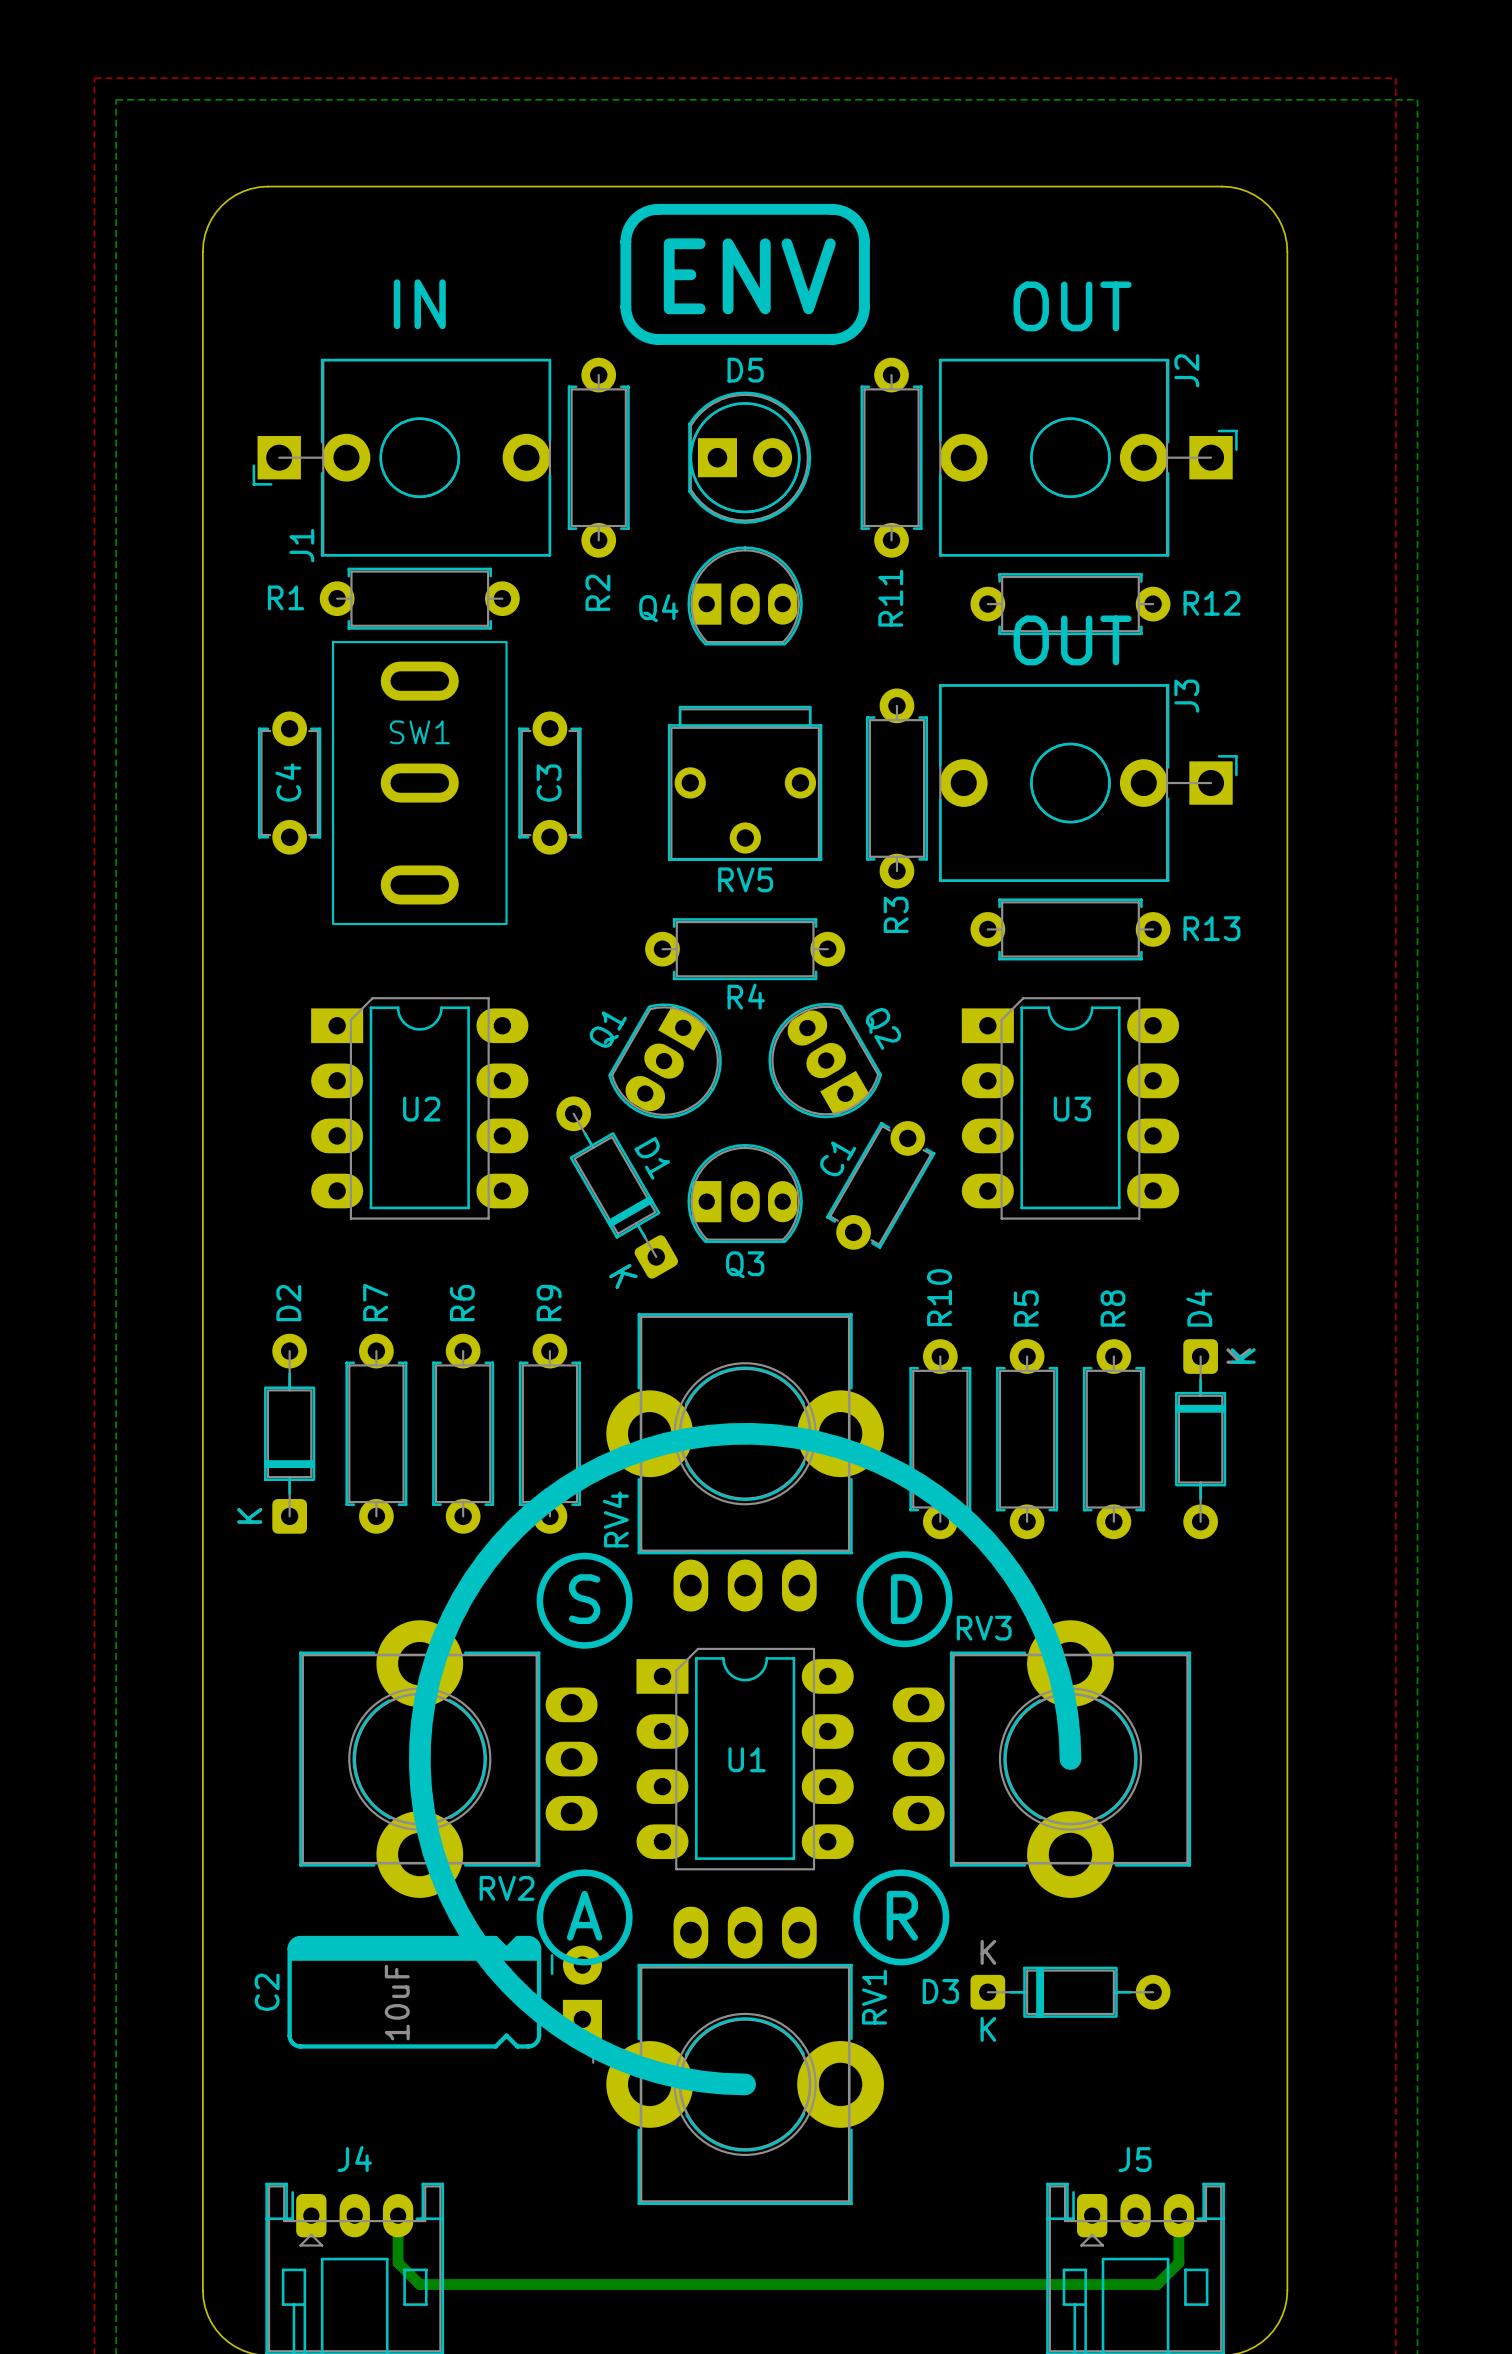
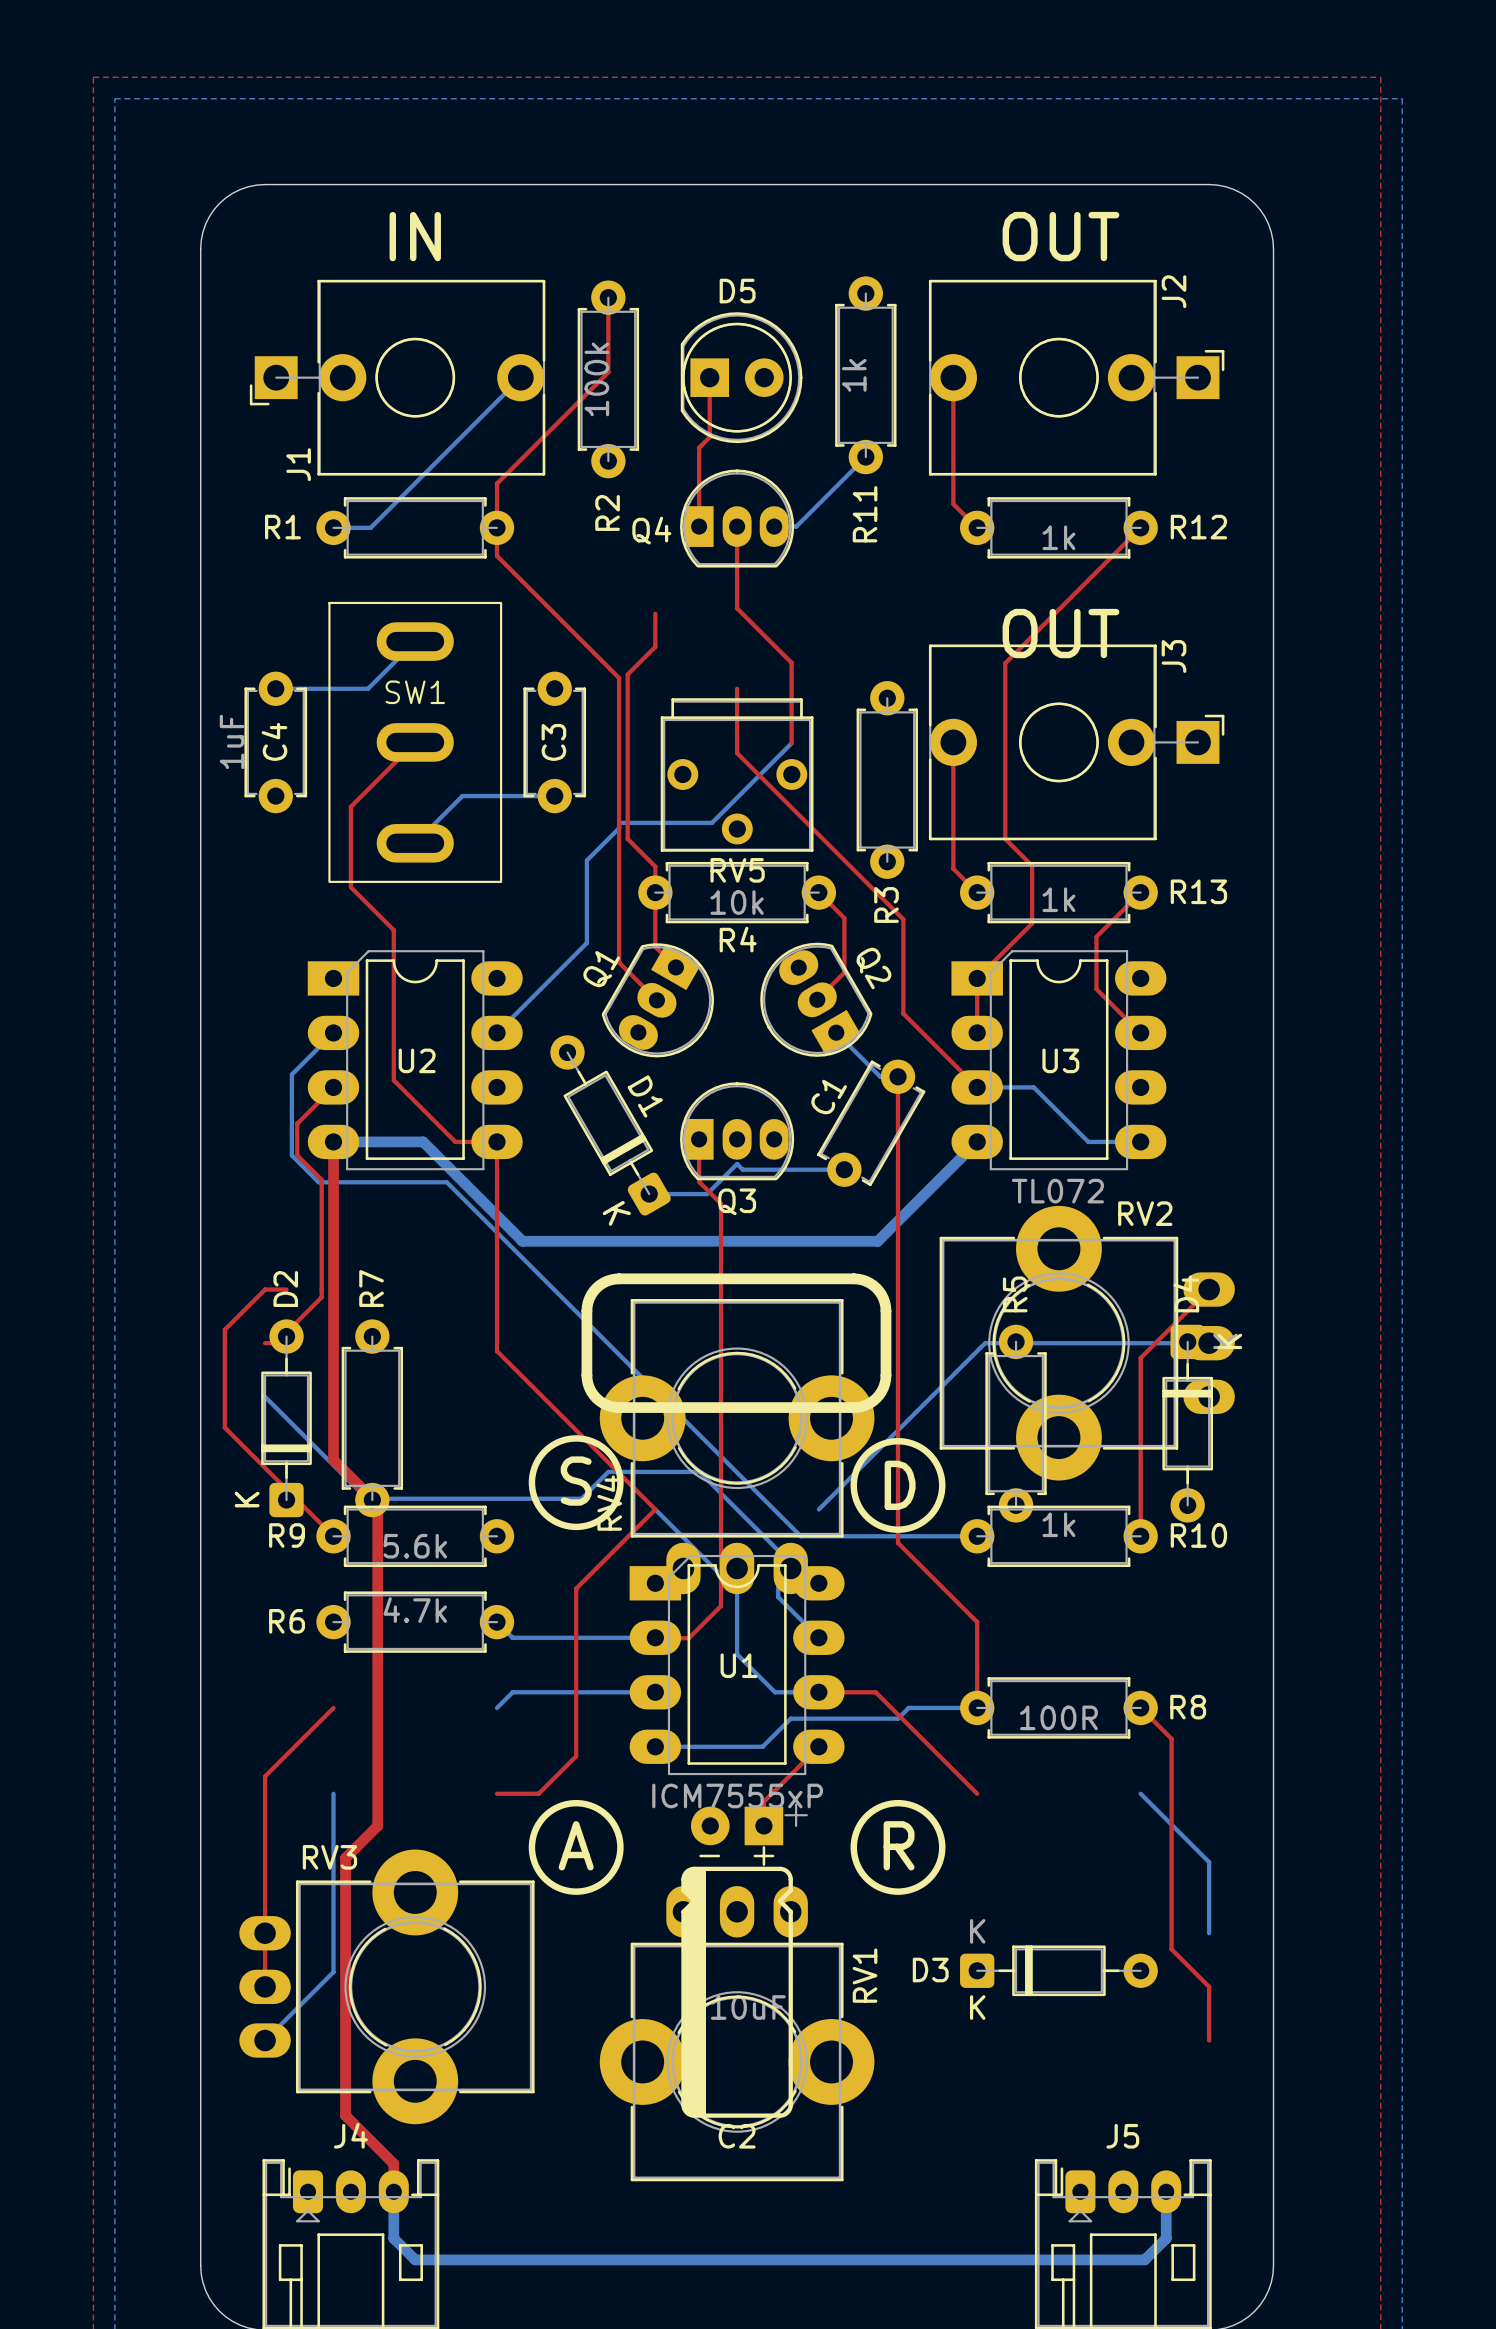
line: (658, 209) (831, 209) (848, 213) (860, 225) (864, 237) (864, 306) (860, 323) (848, 335) (831, 339) (658, 339) (642, 335) (630, 323) (626, 311) (626, 237) (630, 225) (635, 218) (645, 211) (658, 209) -> none
text: ENV (749, 276) -> none
top track: none -> (608, 297) (608, 372) (497, 483) (497, 555) (619, 678) (619, 962) (656, 1000)
text position: IN (419, 304) -> IN (415, 236)
text position: OUT (1072, 306) -> OUT (1060, 236)
R11 value: none -> 1k (854, 375)
bottom track: none -> (520, 377) (370, 527) (333, 527)
top track: none -> (709, 377) (710, 436) (699, 447) (699, 526)
top track: none -> (953, 377) (953, 504) (977, 527)
R2 value: none -> 100k (596, 379)
J1 position: (401, 457) -> (397, 377)
R2 position: (598, 457) -> (608, 379)
D5 position: (749, 457) -> (741, 377)
R11 position: (891, 457) -> (865, 375)
J2 position: (1088, 457) -> (1076, 377)
bottom track: none -> (865, 457) (796, 526) (774, 526)
top track: none -> (737, 526) (737, 608) (791, 662) (791, 743)
top track: none -> (1140, 527) (1005, 663) (1005, 838) (1032, 865) (1032, 923) (977, 978) (977, 1032)
R12 value: none -> 1k (1058, 537)
Q4 position: (745, 595) -> (737, 518)
R1 position: (419, 598) -> (415, 527)
R12 position: (1070, 604) -> (1058, 527)
top track: none -> (655, 613) (655, 646) (627, 674) (627, 838) (655, 866) (655, 946) (675, 967)
bottom track: none -> (415, 641) (368, 688) (275, 688)
top track: none -> (737, 688) (737, 753) (903, 919) (903, 1013) (977, 1087)
C4 value: none -> 1uF (232, 741)
top track: none -> (415, 742) (350, 806) (350, 887) (393, 930) (393, 1080) (455, 1141) (497, 1141) (497, 1351) (655, 1509) (576, 1588) (576, 1756) (538, 1793) (497, 1793)
top track: none -> (953, 742) (953, 868) (977, 892)
bottom track: none -> (791, 743) (712, 822) (619, 822) (619, 828) (586, 860) (586, 943) (497, 1032)
C4 position: (289, 783) -> (275, 742)
SW1 position: (419, 783) -> (415, 742)
C3 position: (549, 783) -> (554, 742)
J3 position: (1088, 783) -> (1076, 742)
bottom track: none -> (554, 796) (462, 796) (415, 843)
top track: none -> (818, 892) (844, 918) (844, 972) (817, 999)
top track: none -> (1140, 892) (1096, 936) (1096, 989) (1140, 1032)
R13 value: none -> 1k (1058, 899)
R4 value: none -> 10k (737, 902)
R13 position: (1070, 929) -> (1058, 892)
R4 position: (745, 949) -> (737, 892)
bottom track: none -> (836, 1032) (880, 1076) (898, 1076)
bottom track: none -> (333, 1032) (291, 1074) (291, 1155) (318, 1182) (446, 1182) (800, 1536) (977, 1536)
Q2 position: (825, 1060) -> (816, 999)
Q1 position: (665, 1061) -> (657, 1000)
top track: none -> (898, 1076) (898, 1542) (977, 1622) (977, 1707)
top track: none -> (333, 1087) (297, 1123) (297, 1155) (321, 1179) (321, 1297) (275, 1343) (265, 1343)
bottom track: none -> (977, 1087) (1033, 1087) (1088, 1141) (1140, 1141)
U2 position: (419, 1108) -> (415, 1060)
U3 position: (1070, 1108) -> (1058, 1060)
top track: none -> (699, 1139) (699, 1182) (721, 1203) (721, 1606) (688, 1638) (655, 1637)
bottom track: none -> (333, 1141) (423, 1141) (522, 1241) (877, 1241) (977, 1141)
top track: none -> (333, 1141) (333, 1459) (377, 1504) (377, 1825) (345, 1858) (345, 2115) (393, 2163) (393, 2191)
bottom track: none -> (844, 1169) (742, 1169) (737, 1164) (707, 1194) (649, 1194)
C1 position: (880, 1185) -> (871, 1123)
D1 position: (617, 1187) -> (610, 1125)
Q3 position: (745, 1193) -> (737, 1131)
U3 value: none -> TL072 (1057, 1191)
top track: none -> (286, 1289) (265, 1289) (224, 1329) (224, 1427) (333, 1536)
R6 name position: R6 (462, 1303) -> R6 (287, 1621)
R9 name position: R9 (549, 1303) -> R9 (287, 1535)
top track: none -> (1209, 1289) (1140, 1357) (1140, 1536)
bottom track: none -> (1209, 1343) (985, 1343) (818, 1509)
bottom track: none -> (265, 1396) (366, 1498) (581, 1498) (608, 1471) (699, 1471) (778, 1550) (778, 1597) (818, 1637)
line: none -> (853, 1407) (858, 1407) (862, 1406) (873, 1400) (881, 1391) (885, 1379) (884, 1302) (879, 1291) (866, 1281) (853, 1278) (619, 1278) (603, 1283) (593, 1291) (589, 1298) (586, 1311) (587, 1379) (593, 1394) (606, 1405) (619, 1407) (854, 1407)
R6 rotation: 0° (463, 1433) -> 90° clockwise (415, 1622)
R6 position: (463, 1433) -> (415, 1622)
R9 rotation: 0° (549, 1433) -> 90° clockwise (415, 1536)
R9 position: (549, 1433) -> (415, 1536)
R10 rotation: 0° (940, 1439) -> 90° clockwise (1058, 1536)
R10 position: (940, 1439) -> (1058, 1536)
R8 rotation: 0° (1113, 1439) -> 90° clockwise (1058, 1707)
R8 position: (1113, 1439) -> (1058, 1707)
bottom track: none -> (655, 1509) (737, 1591) (737, 1654) (775, 1692) (818, 1692)
R10 value: none -> 1k (1058, 1524)
R9 value: none -> 5.6k (415, 1546)
text position: S (584, 1599) -> S (576, 1481)
drawing position: (904, 1599) -> (898, 1485)
text position: D (906, 1599) -> D (900, 1485)
drawing position: (584, 1600) -> (576, 1482)
R6 value: none -> 4.7k (415, 1610)
bottom track: none -> (497, 1622) (512, 1637) (655, 1637)
bottom track: none -> (655, 1692) (512, 1692) (497, 1707)
top track: none -> (818, 1692) (875, 1692) (977, 1793)
top track: none -> (333, 1707) (265, 1776) (265, 1986)
bottom track: none -> (977, 1707) (908, 1707) (898, 1718) (790, 1718) (762, 1746) (655, 1746)
top track: none -> (1140, 1707) (1171, 1738) (1171, 1949) (1209, 1986) (1209, 2040)
R8 value: none -> 100R (1058, 1717)
RV2 position: (448, 1759) -> (1087, 1343)
U1 position: (745, 1759) -> (737, 1665)
RV3 position: (1041, 1759) -> (386, 1986)
line: (1070, 1759) (1067, 1715) (1052, 1651) (1035, 1611) (1012, 1573) (969, 1523) (936, 1495) (899, 1472) (859, 1454) (817, 1441) (774, 1435) (708, 1435) (665, 1443) (624, 1457) (584, 1476) (548, 1500) (515, 1529) (473, 1579) (452, 1617) (435, 1658) (425, 1700) (420, 1744) (421, 1788) (427, 1831) (440, 1873) (458, 1913) (481, 1950) (509, 1983) (559, 2026) (597, 2048) (637, 2066) (701, 2081) (745, 2084) -> none
top track: none -> (818, 1746) (763, 1801) (763, 1825)
bottom track: none -> (333, 1793) (333, 1972) (265, 2040)
bottom track: none -> (1140, 1793) (1209, 1862) (1209, 1933)
U1 value: none -> ICM7555xP (737, 1795)
RV2 name position: RV2 (507, 1888) -> RV2 (1145, 1213)
text position: A (584, 1915) -> A (576, 1845)
text position: R (902, 1915) -> R (899, 1845)
drawing position: (584, 1917) -> (576, 1847)
drawing position: (901, 1917) -> (898, 1847)
C2 rotation: 0° (446, 1999) -> 90° counterclockwise (744, 1960)
C2 position: (446, 1999) -> (744, 1960)

